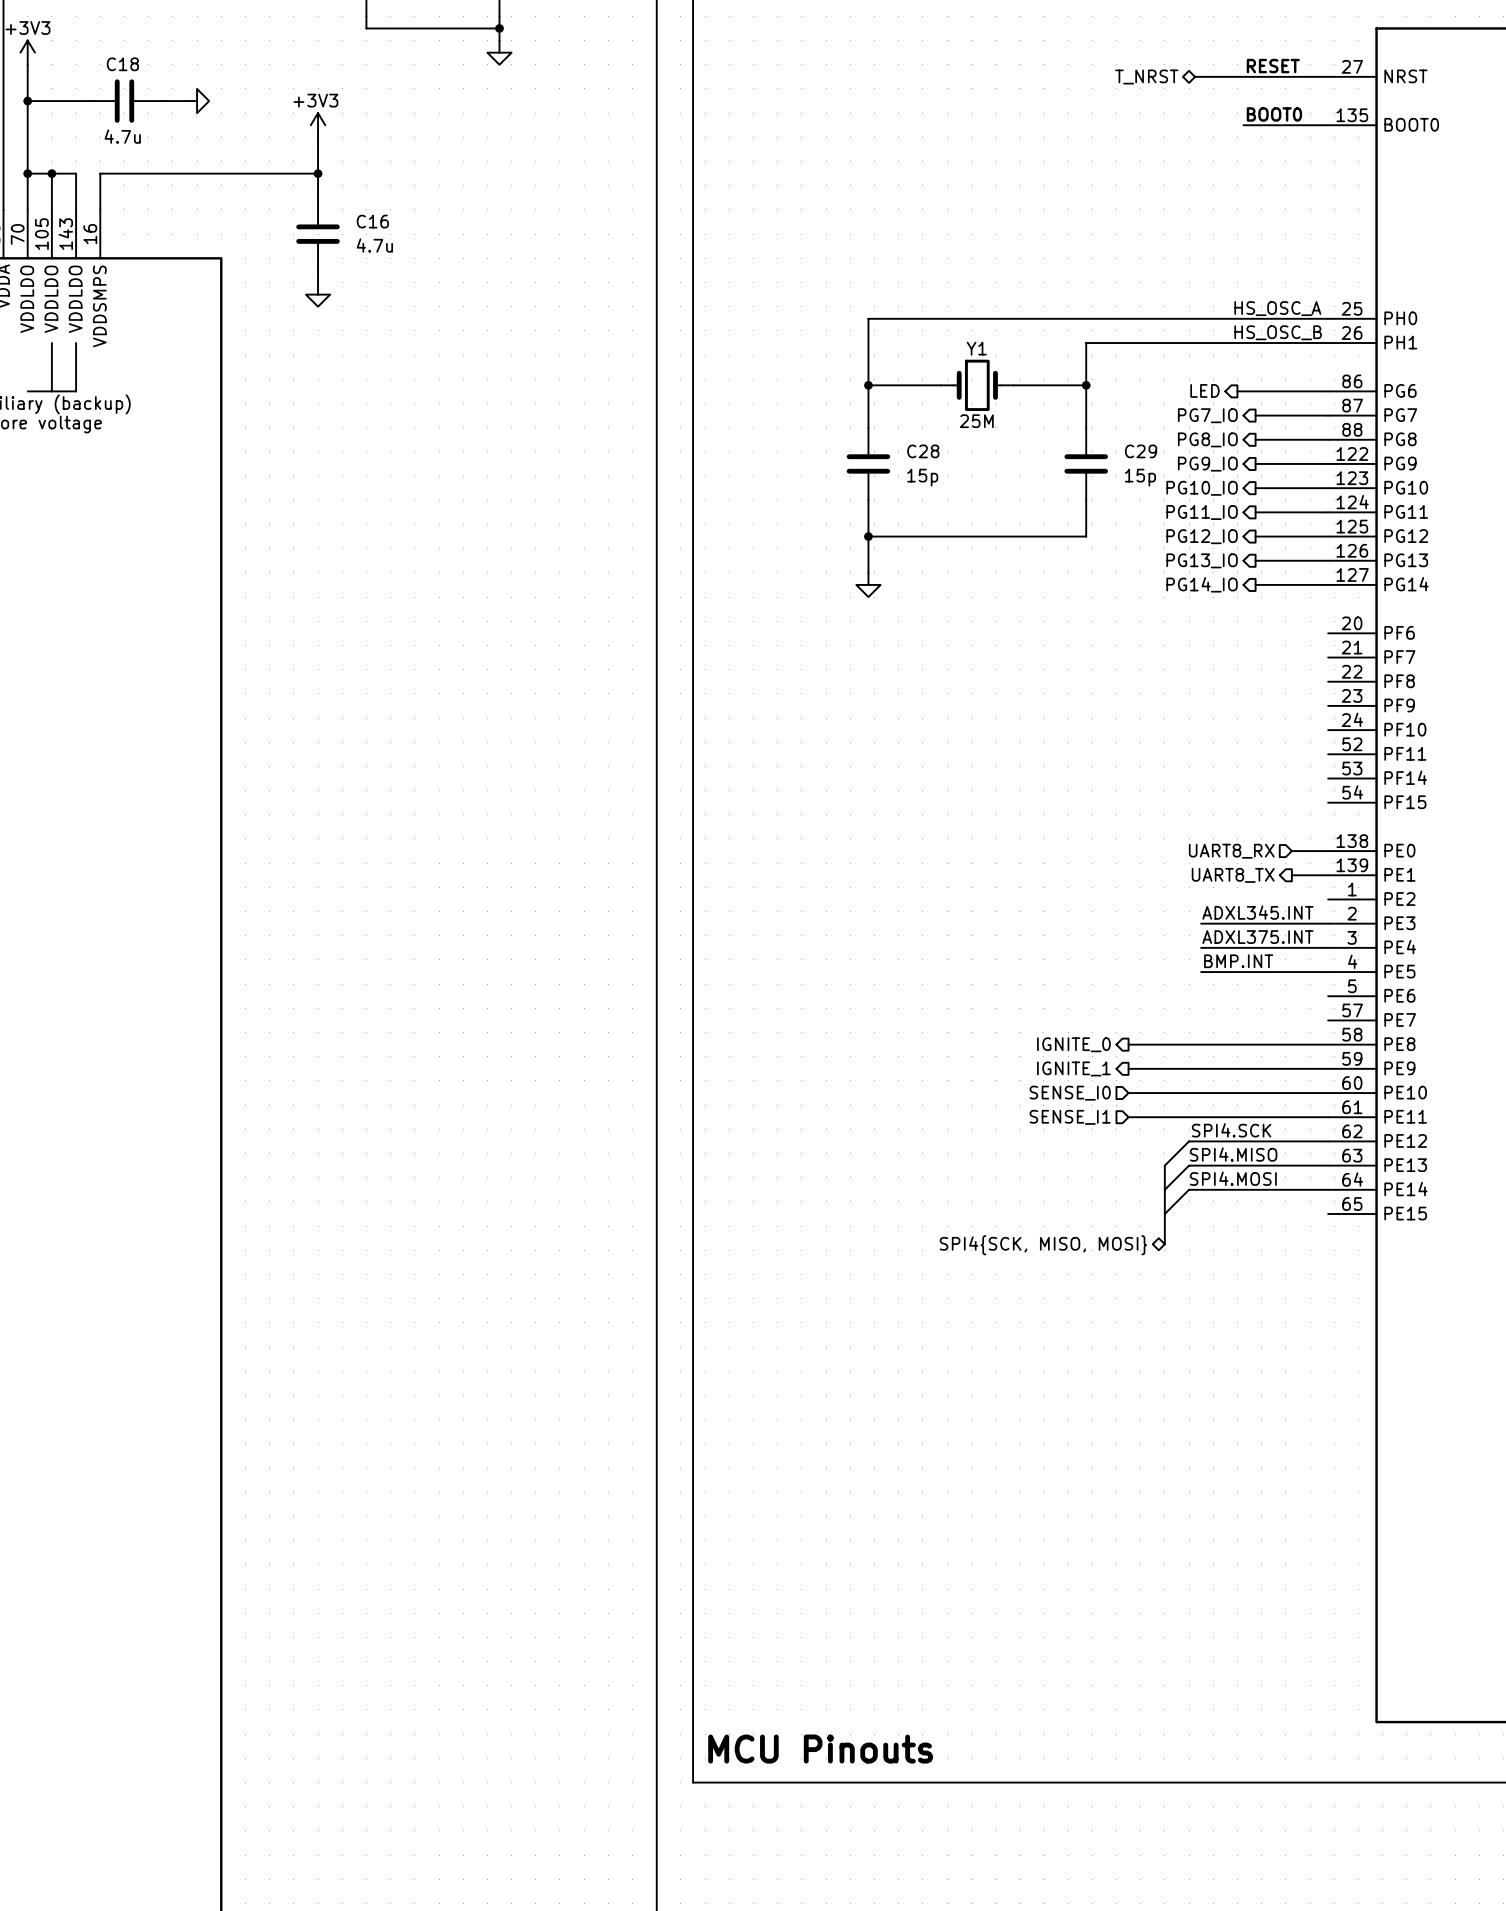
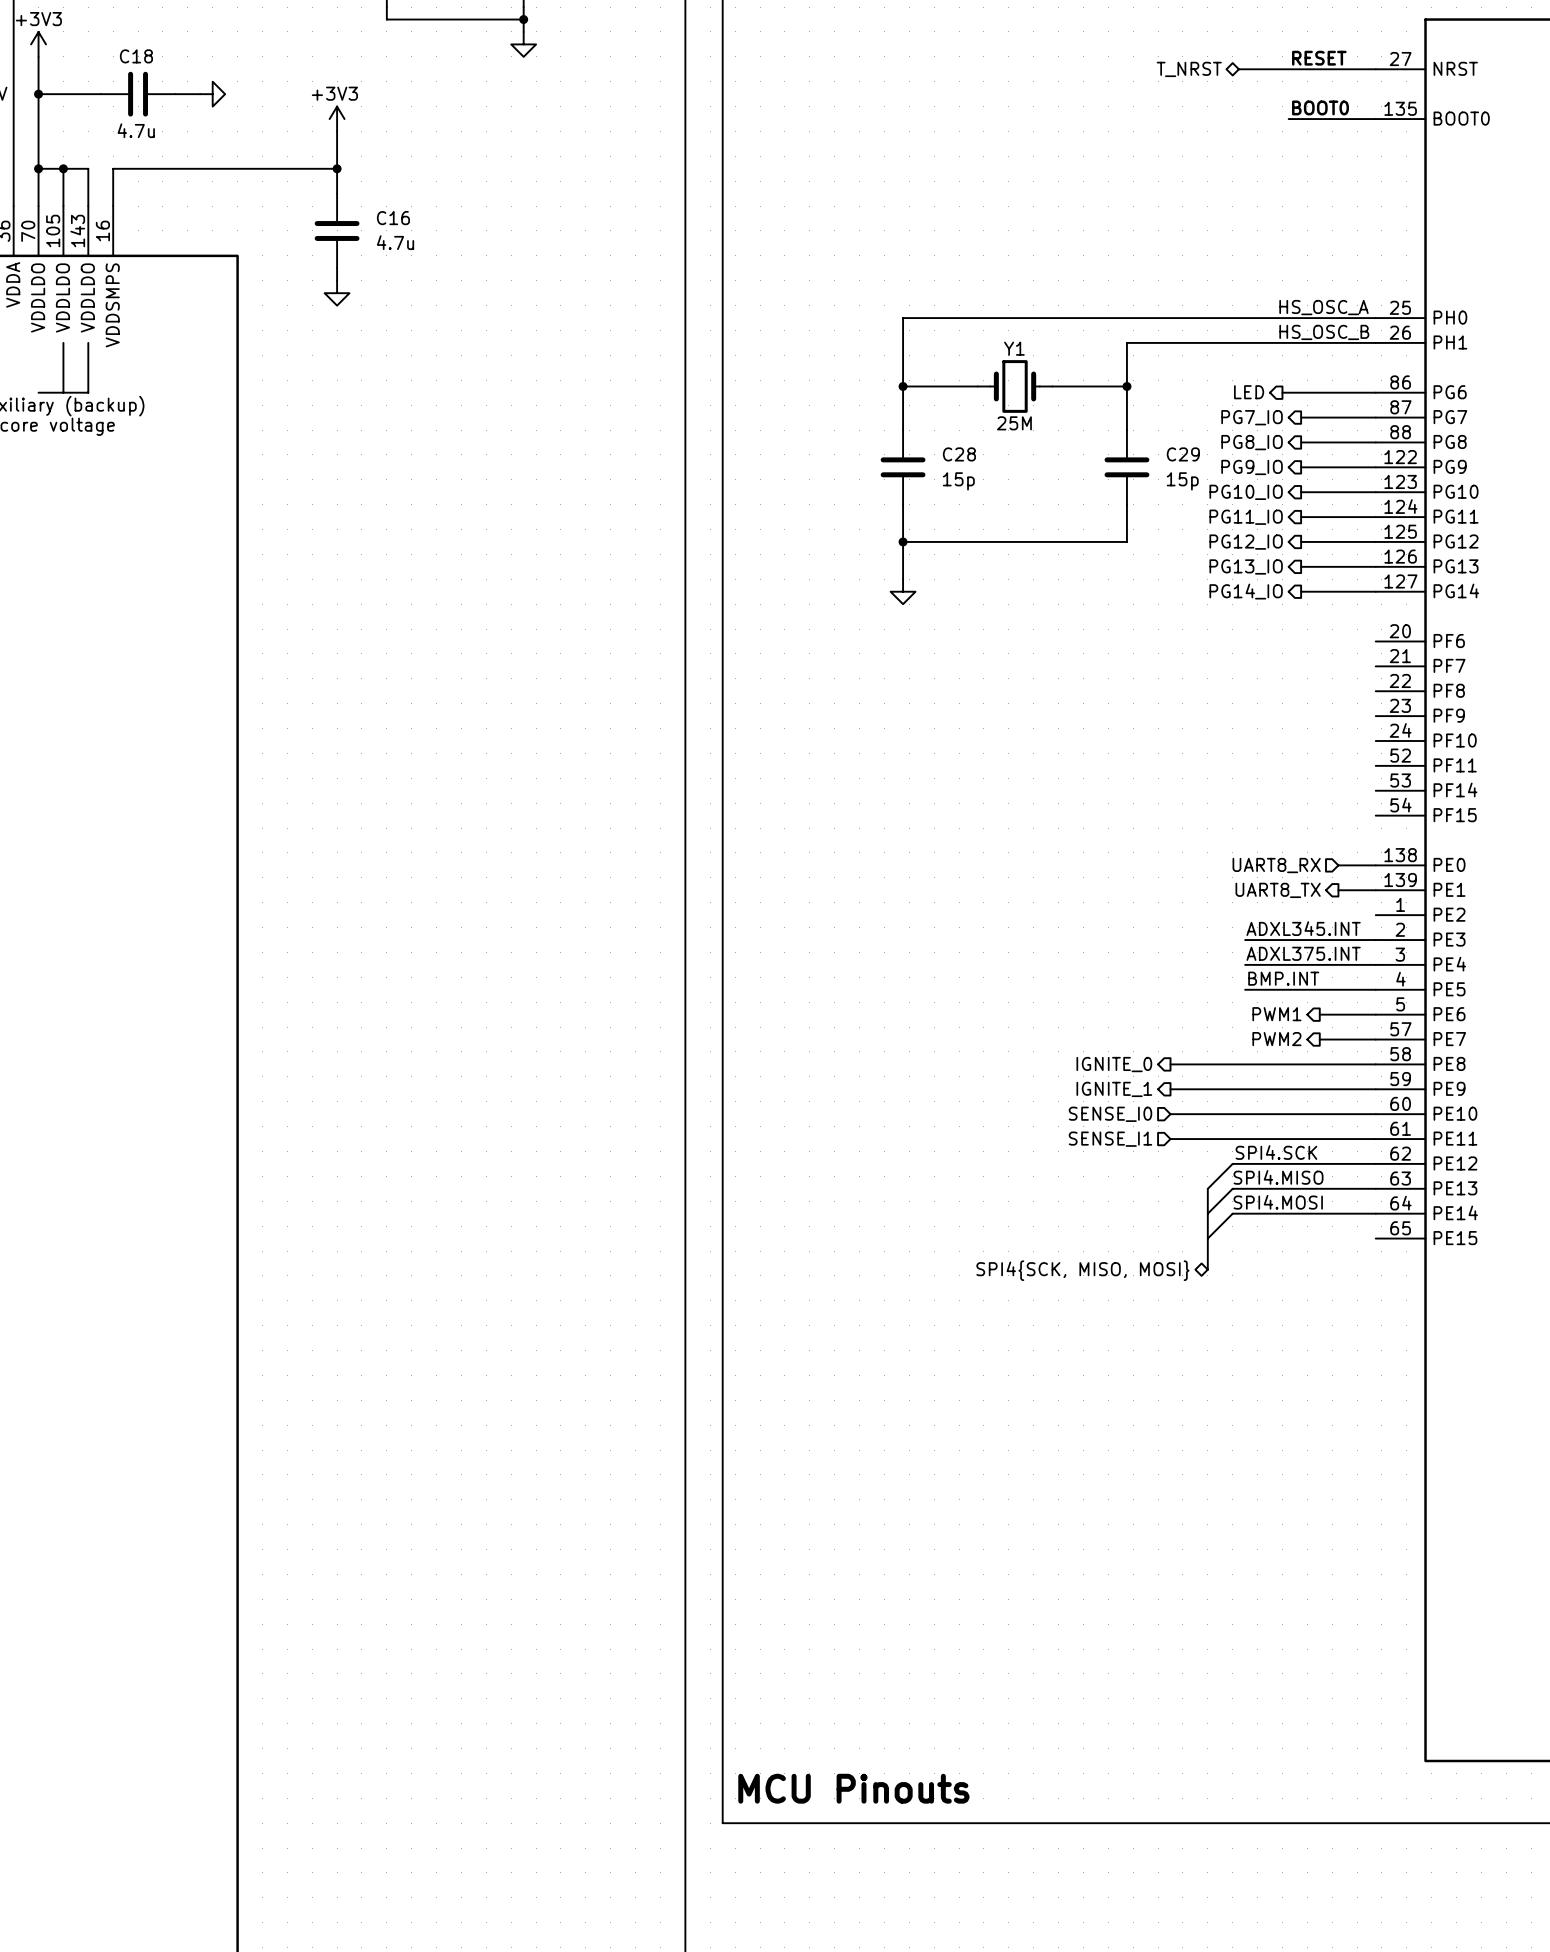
hierarchical label: none -> PWM1 (1276, 1014)
wire: none -> (1319, 1014) (1375, 1014)
hierarchical label: none -> PWM2 (1276, 1039)
wire: none -> (1319, 1039) (1375, 1039)

